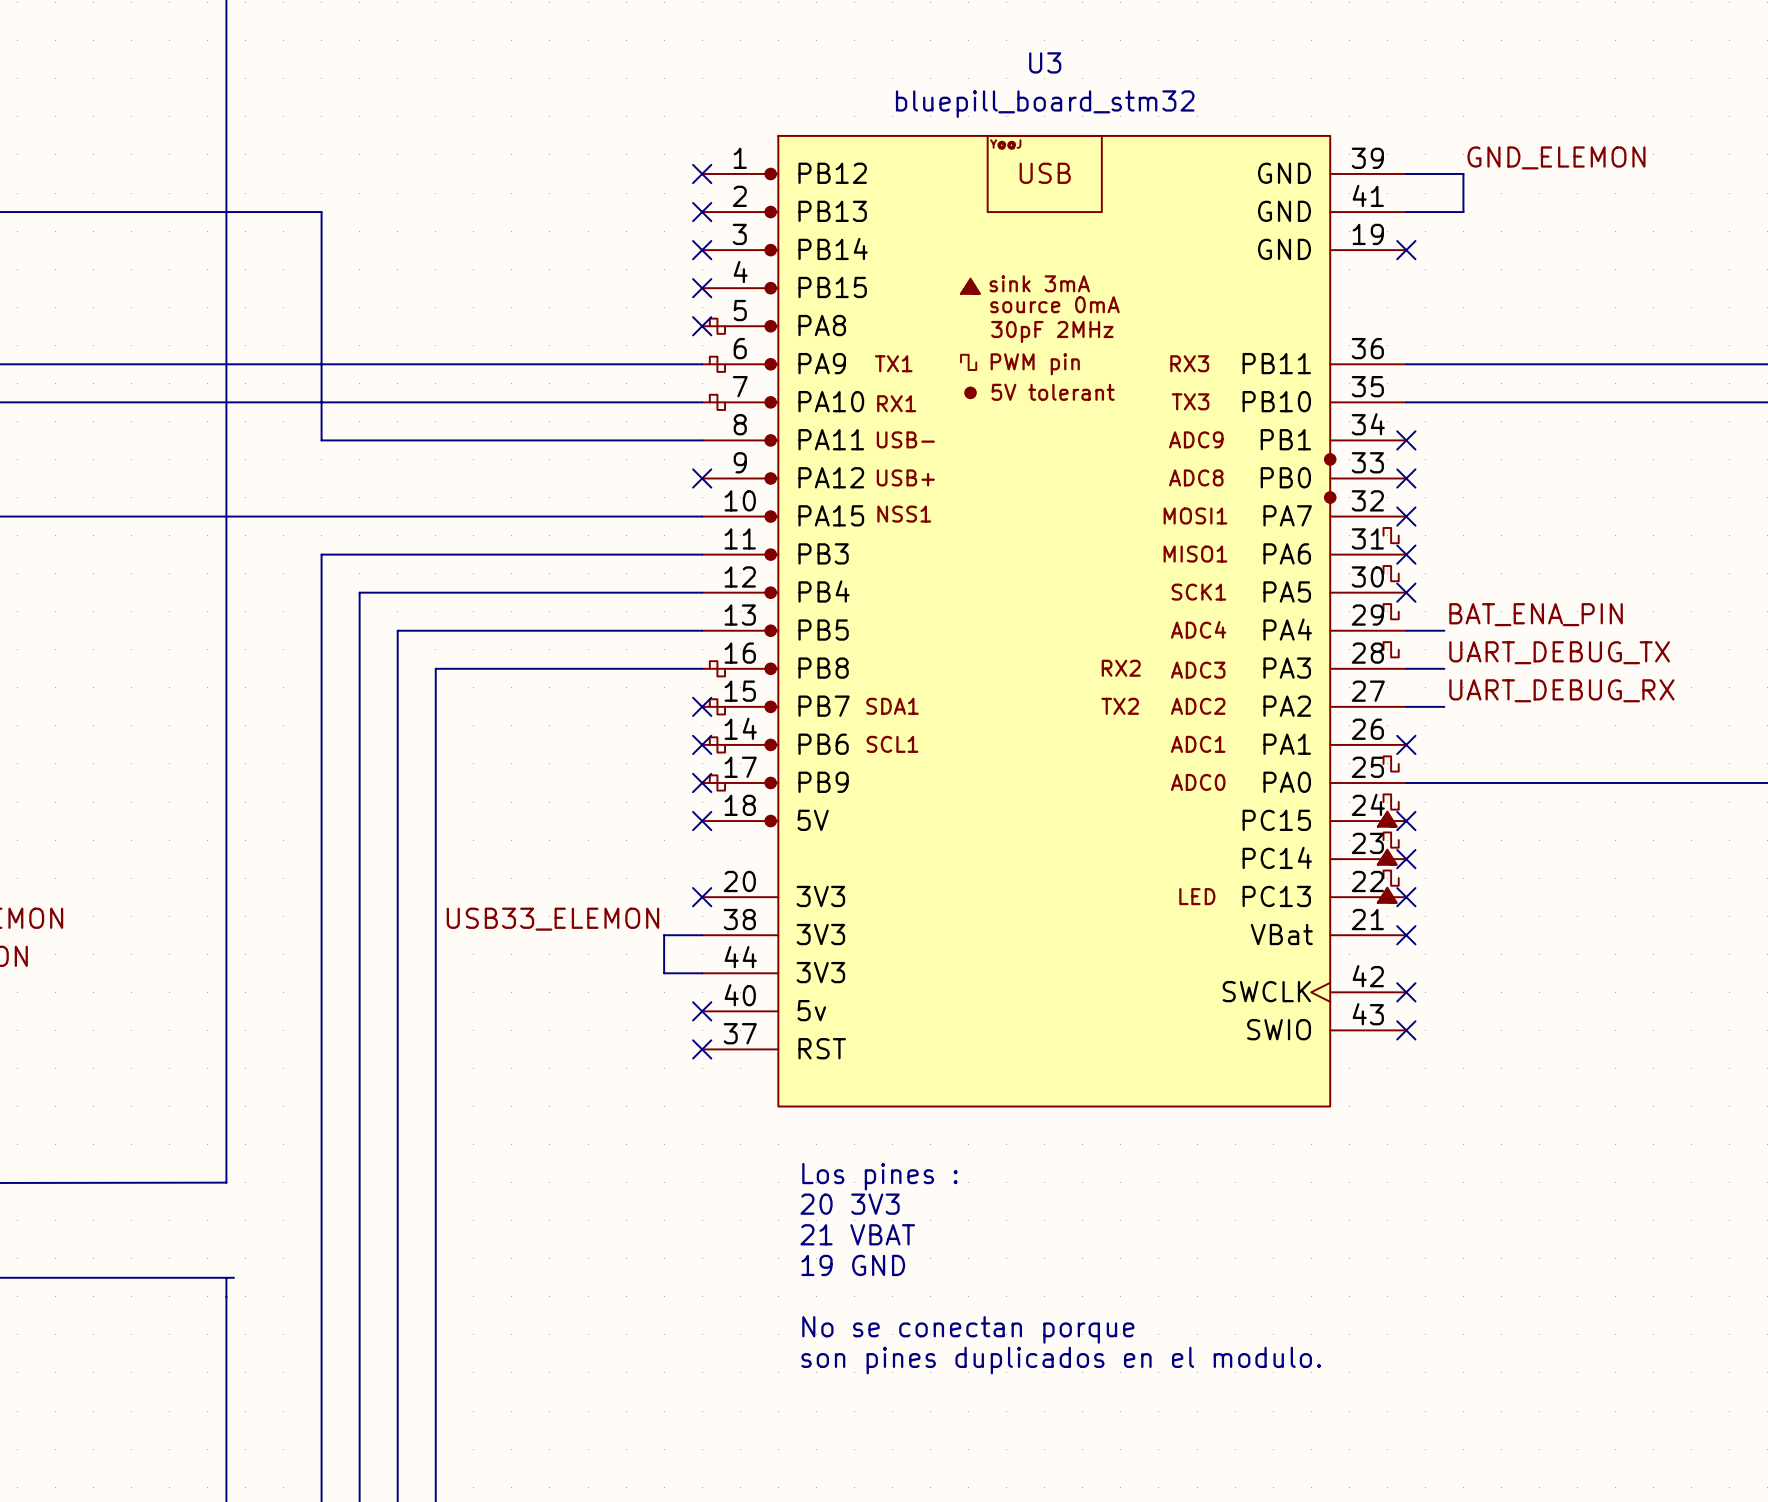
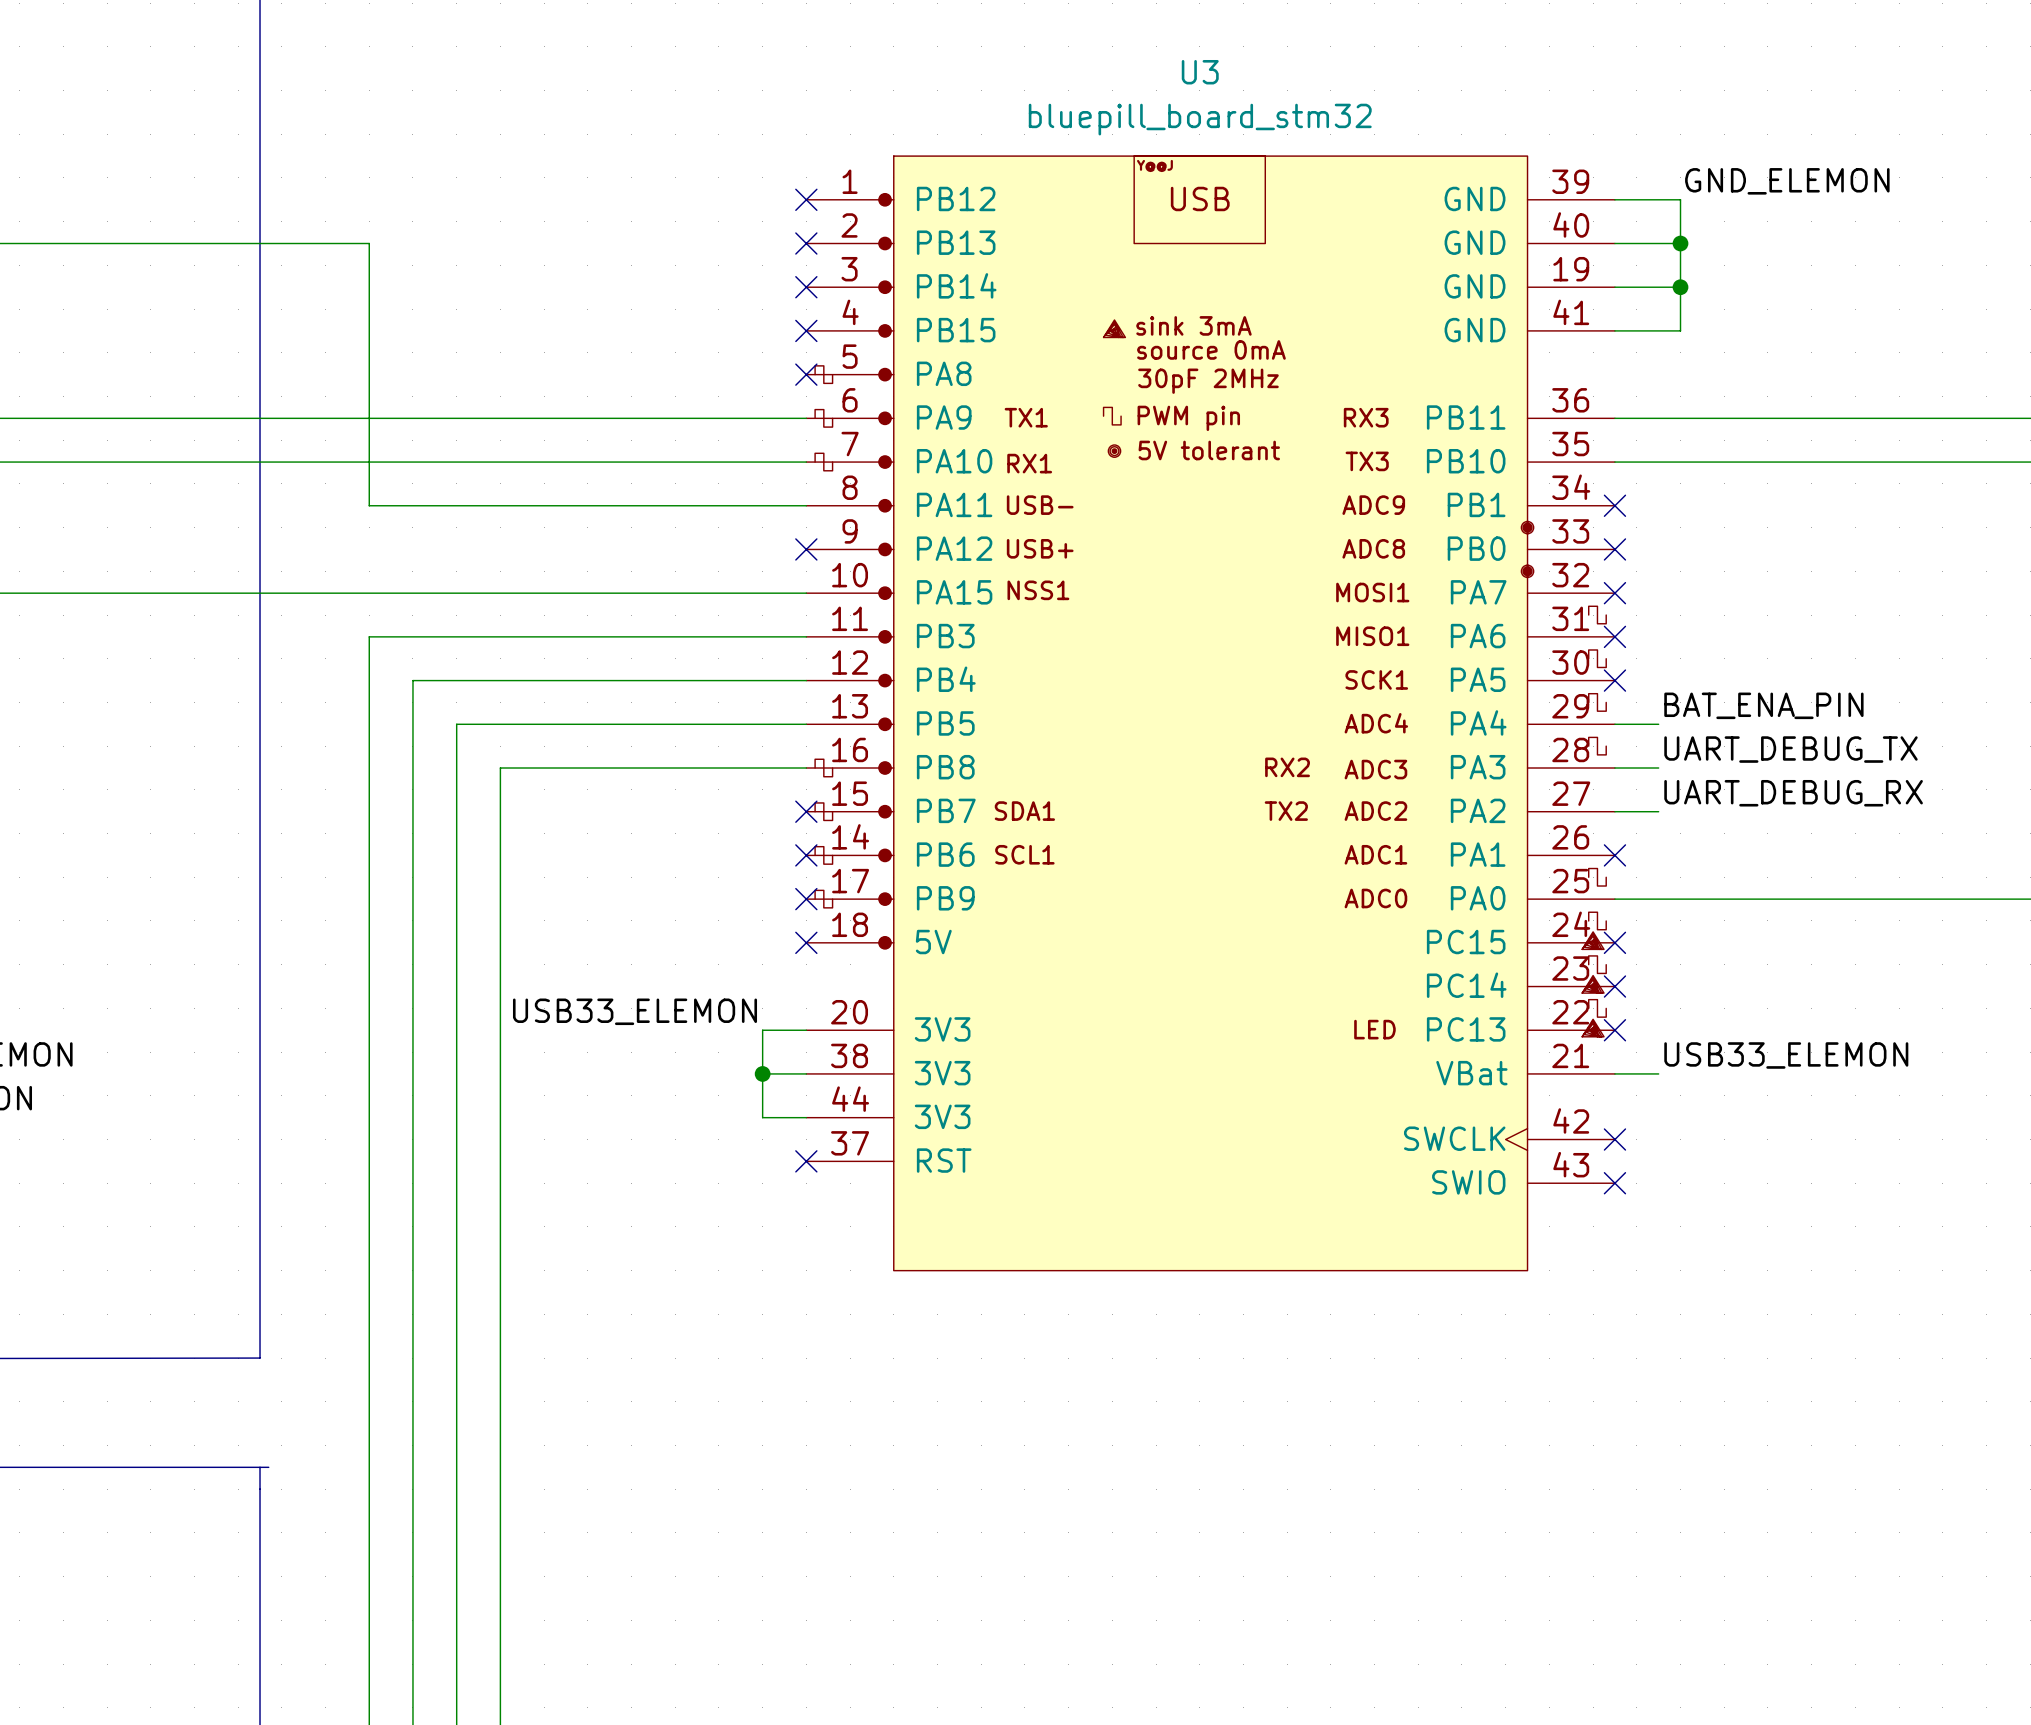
U3 symbol: [702, 135, 1407, 1107] -> [806, 156, 1615, 1271]
wire: none -> (1680, 243) (1680, 330) (1614, 330)
junction: none -> (1680, 243)
wire: none -> (1614, 287) (1680, 287)
no-connect mark: (1406, 250) -> none
junction: none -> (1680, 287)
wire: none -> (806, 1030) (762, 1030) (762, 1073)
no-connect mark: (702, 897) -> none
label position: USB33_ELEMON (552, 919) -> USB33_ELEMON (635, 1011)
label: none -> USB33_ELEMON (1786, 1055)
junction: none -> (762, 1073)
wire: none -> (1614, 1073) (1658, 1073)
no-connect mark: (1406, 935) -> none
no-connect mark: (702, 1049) -> none
text: Los pines : (879, 1176) -> none
text: 20 3V3 (850, 1204) -> none
text: 21 VBAT (857, 1234) -> none
text: 19 GND (853, 1265) -> none
text: No se conectan porque (968, 1329) -> none
text: son pines duplicados en el modulo. (1061, 1360) -> none

